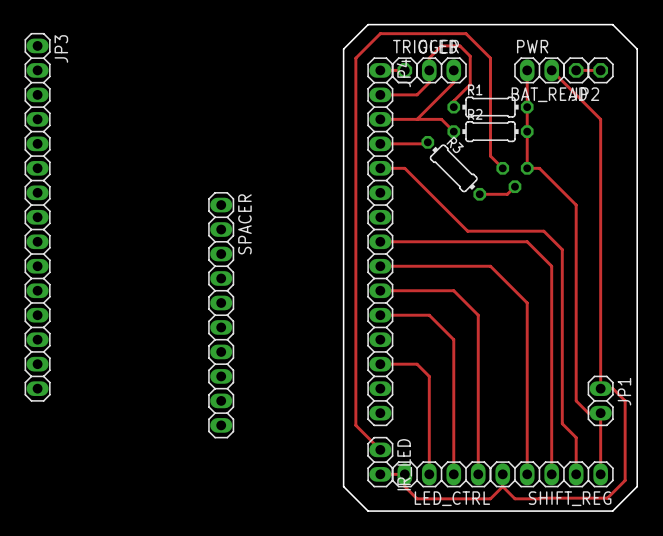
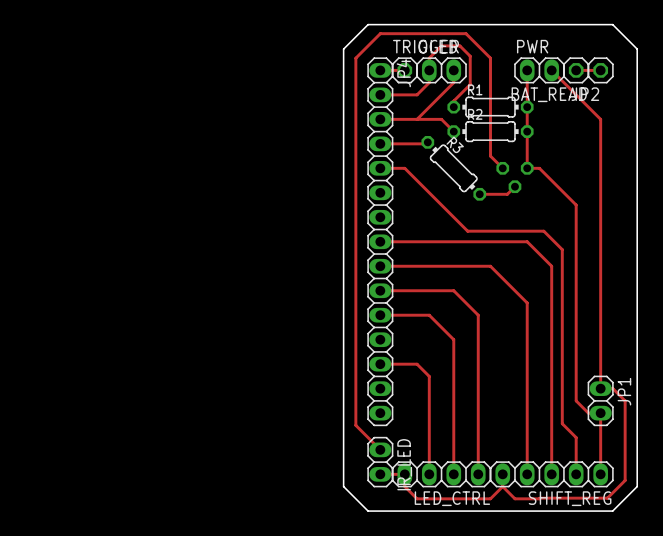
JP3: (37, 217) -> none
SPACER: (221, 315) -> none

